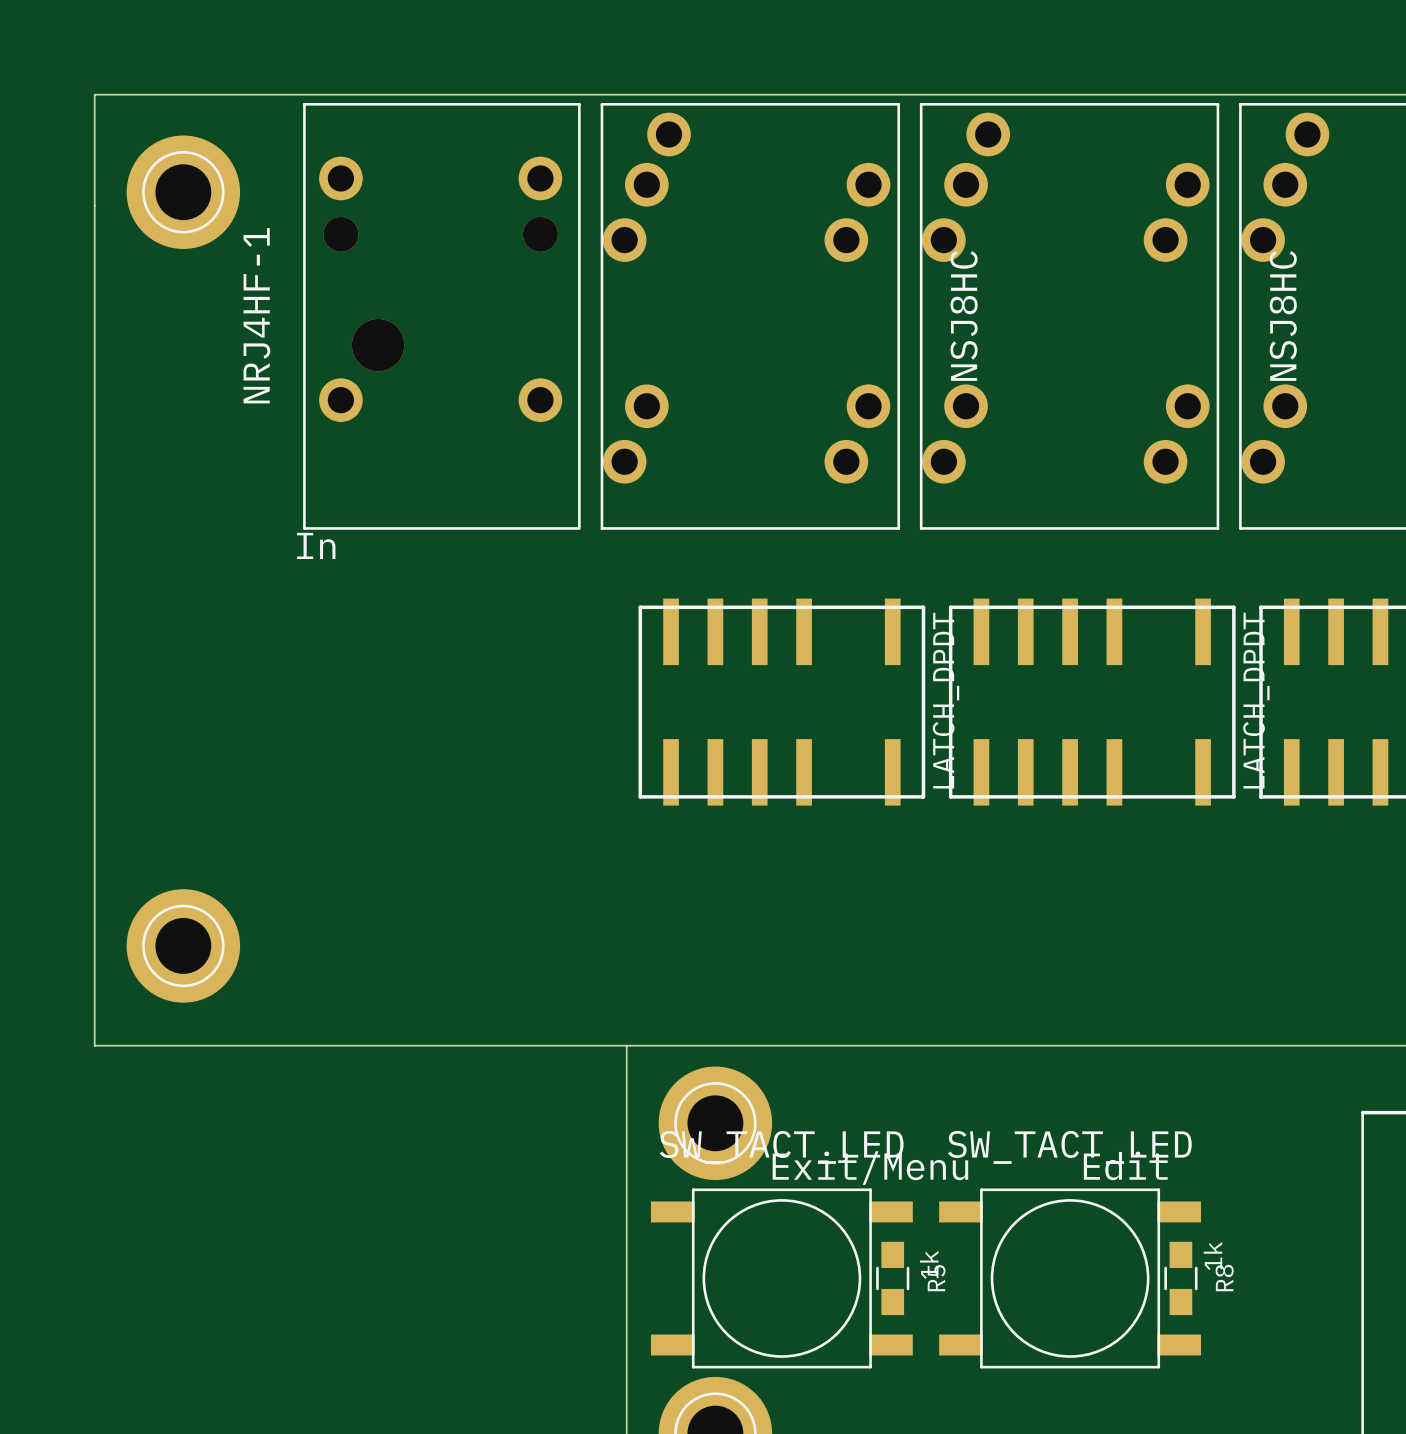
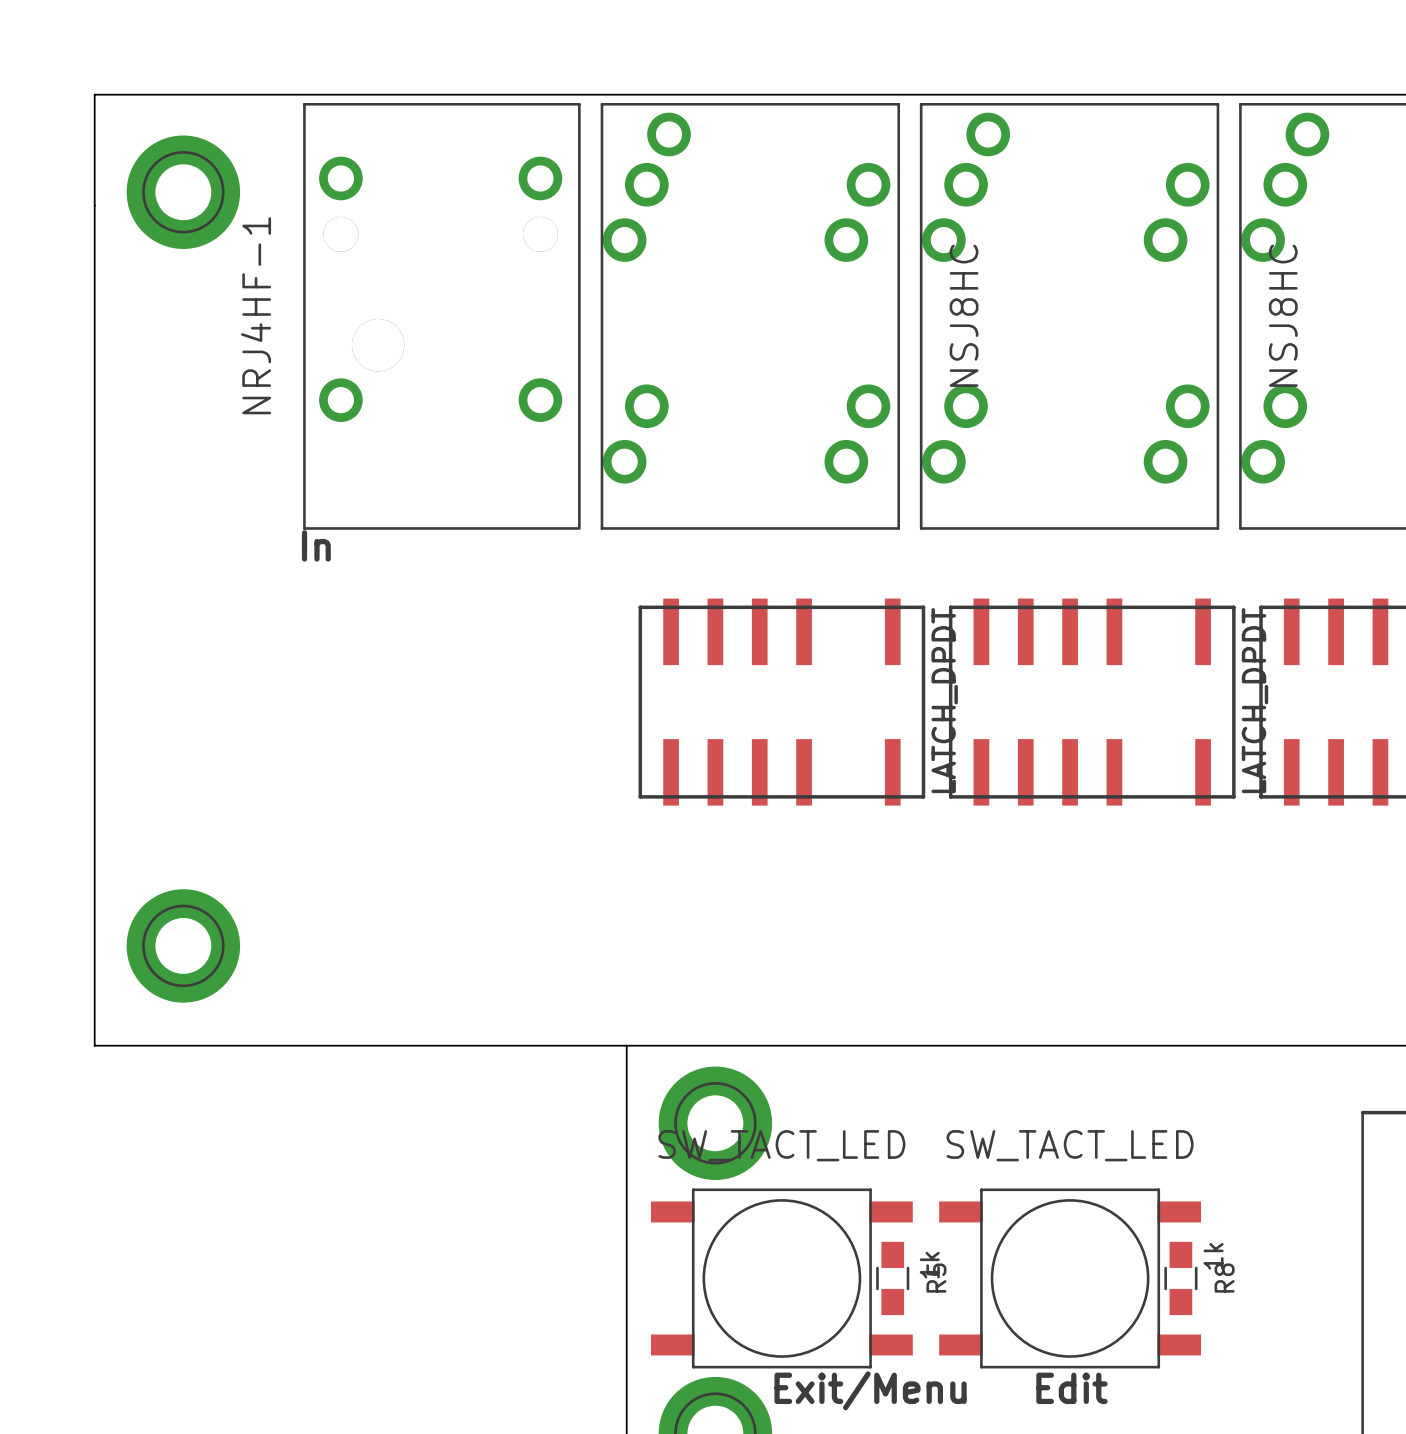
text position: Edit (1125, 1165) -> Edit (1071, 1388)
text position: Exit/Menu (870, 1168) -> Exit/Menu (870, 1390)

